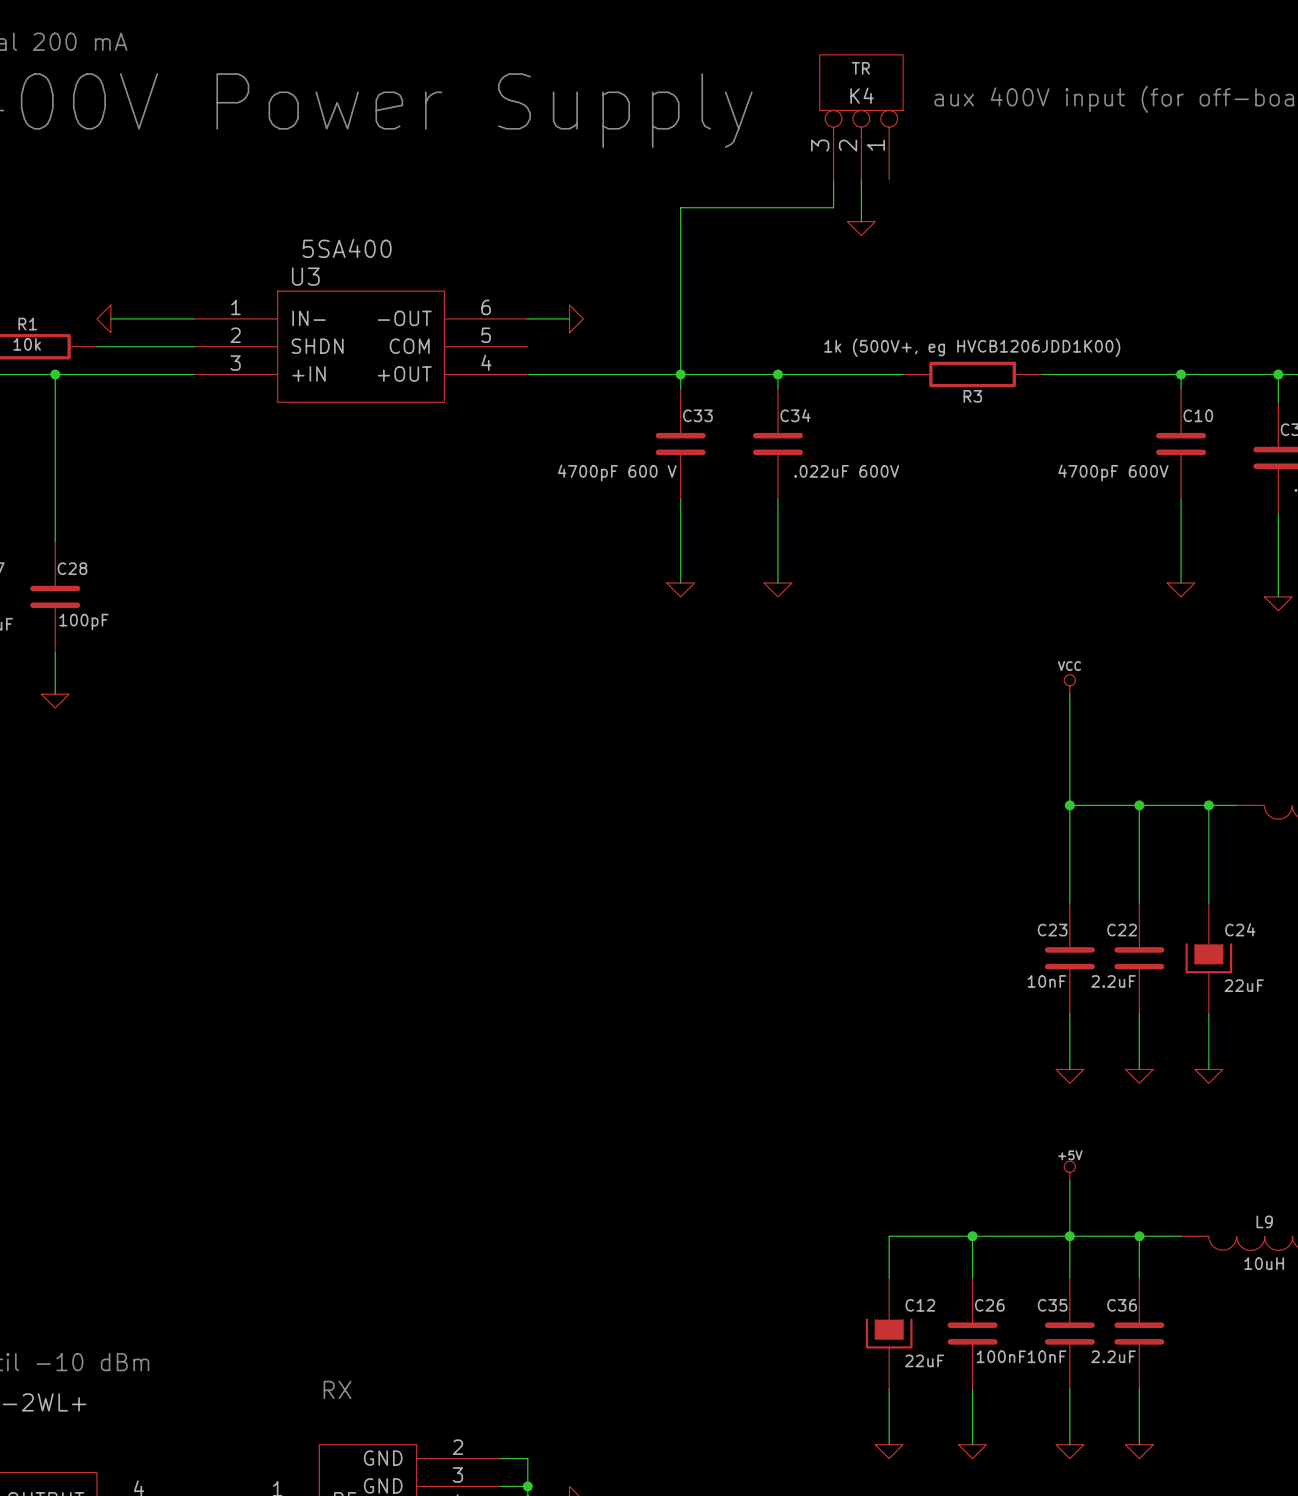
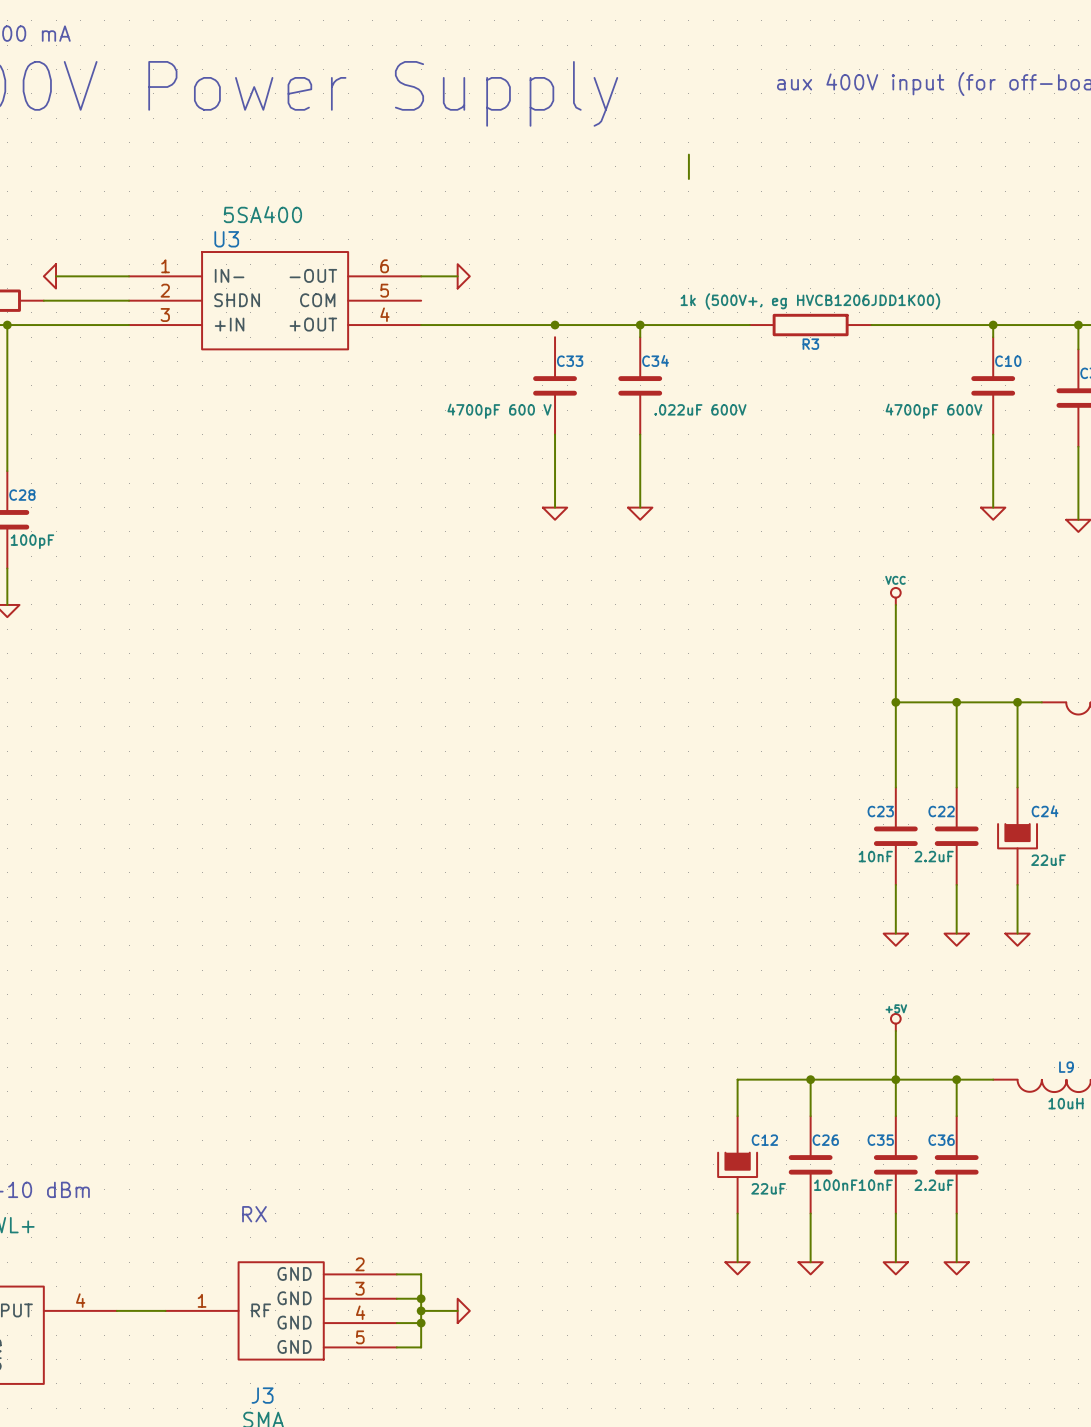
K4: TR (861, 117) -> none
wire: (861, 179) (861, 221) -> none
wire: (833, 207) (680, 207) (680, 388) -> none
power symbol: (861, 228) -> none

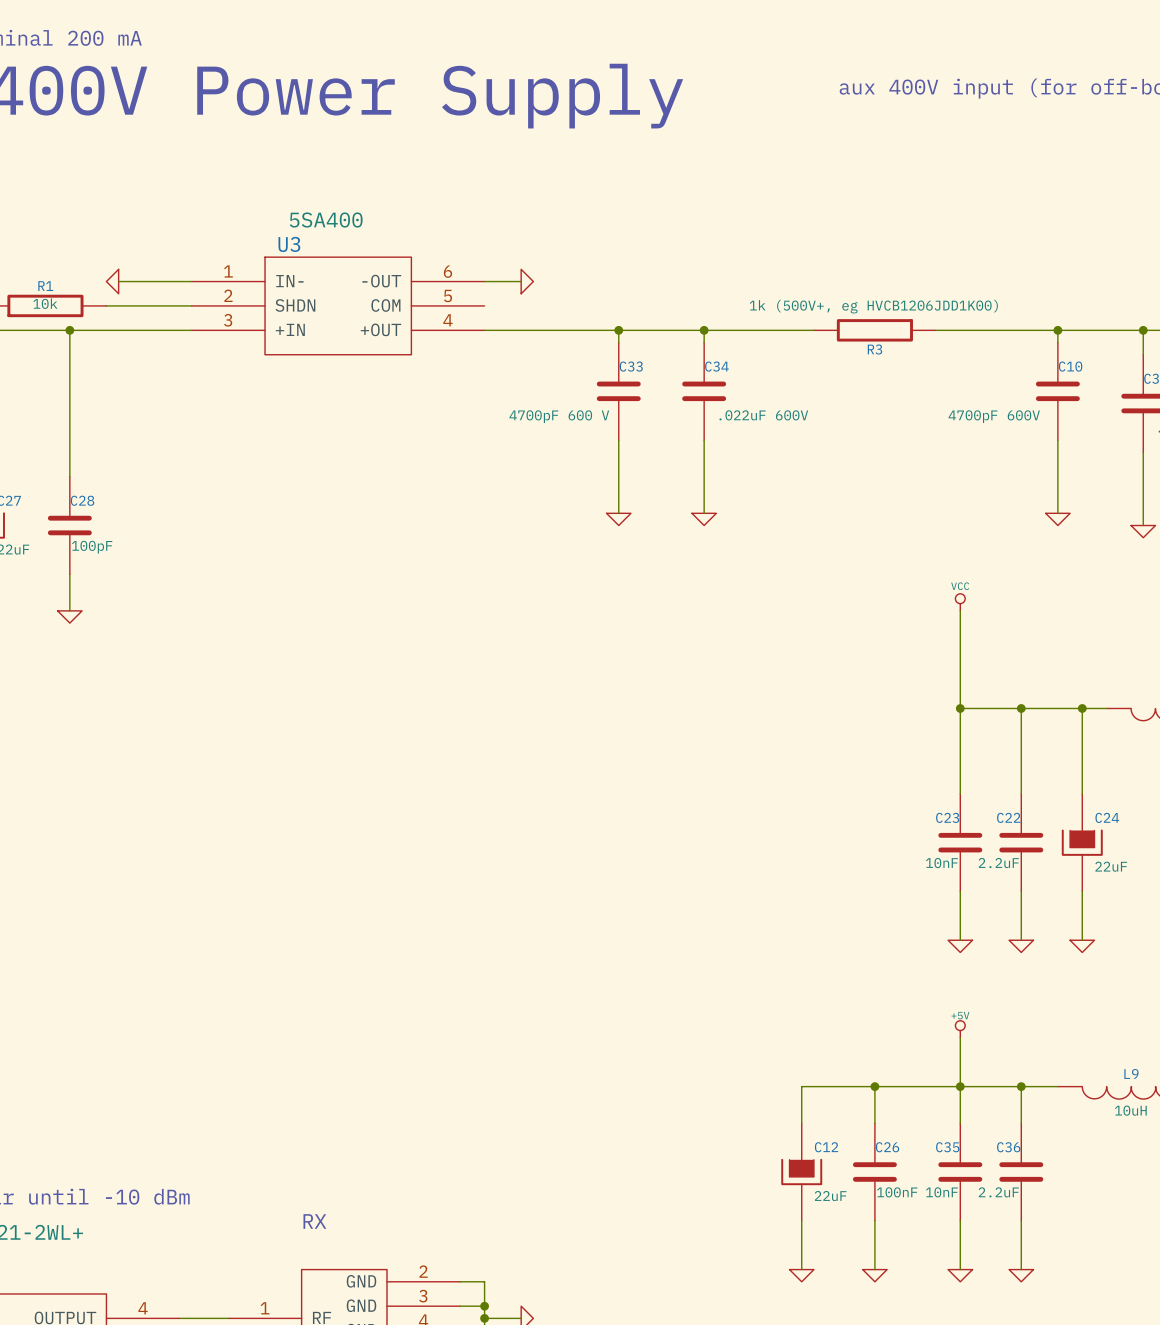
wire: (688, 154) (688, 178) -> none
wire: none -> (618, 330) (618, 342)

